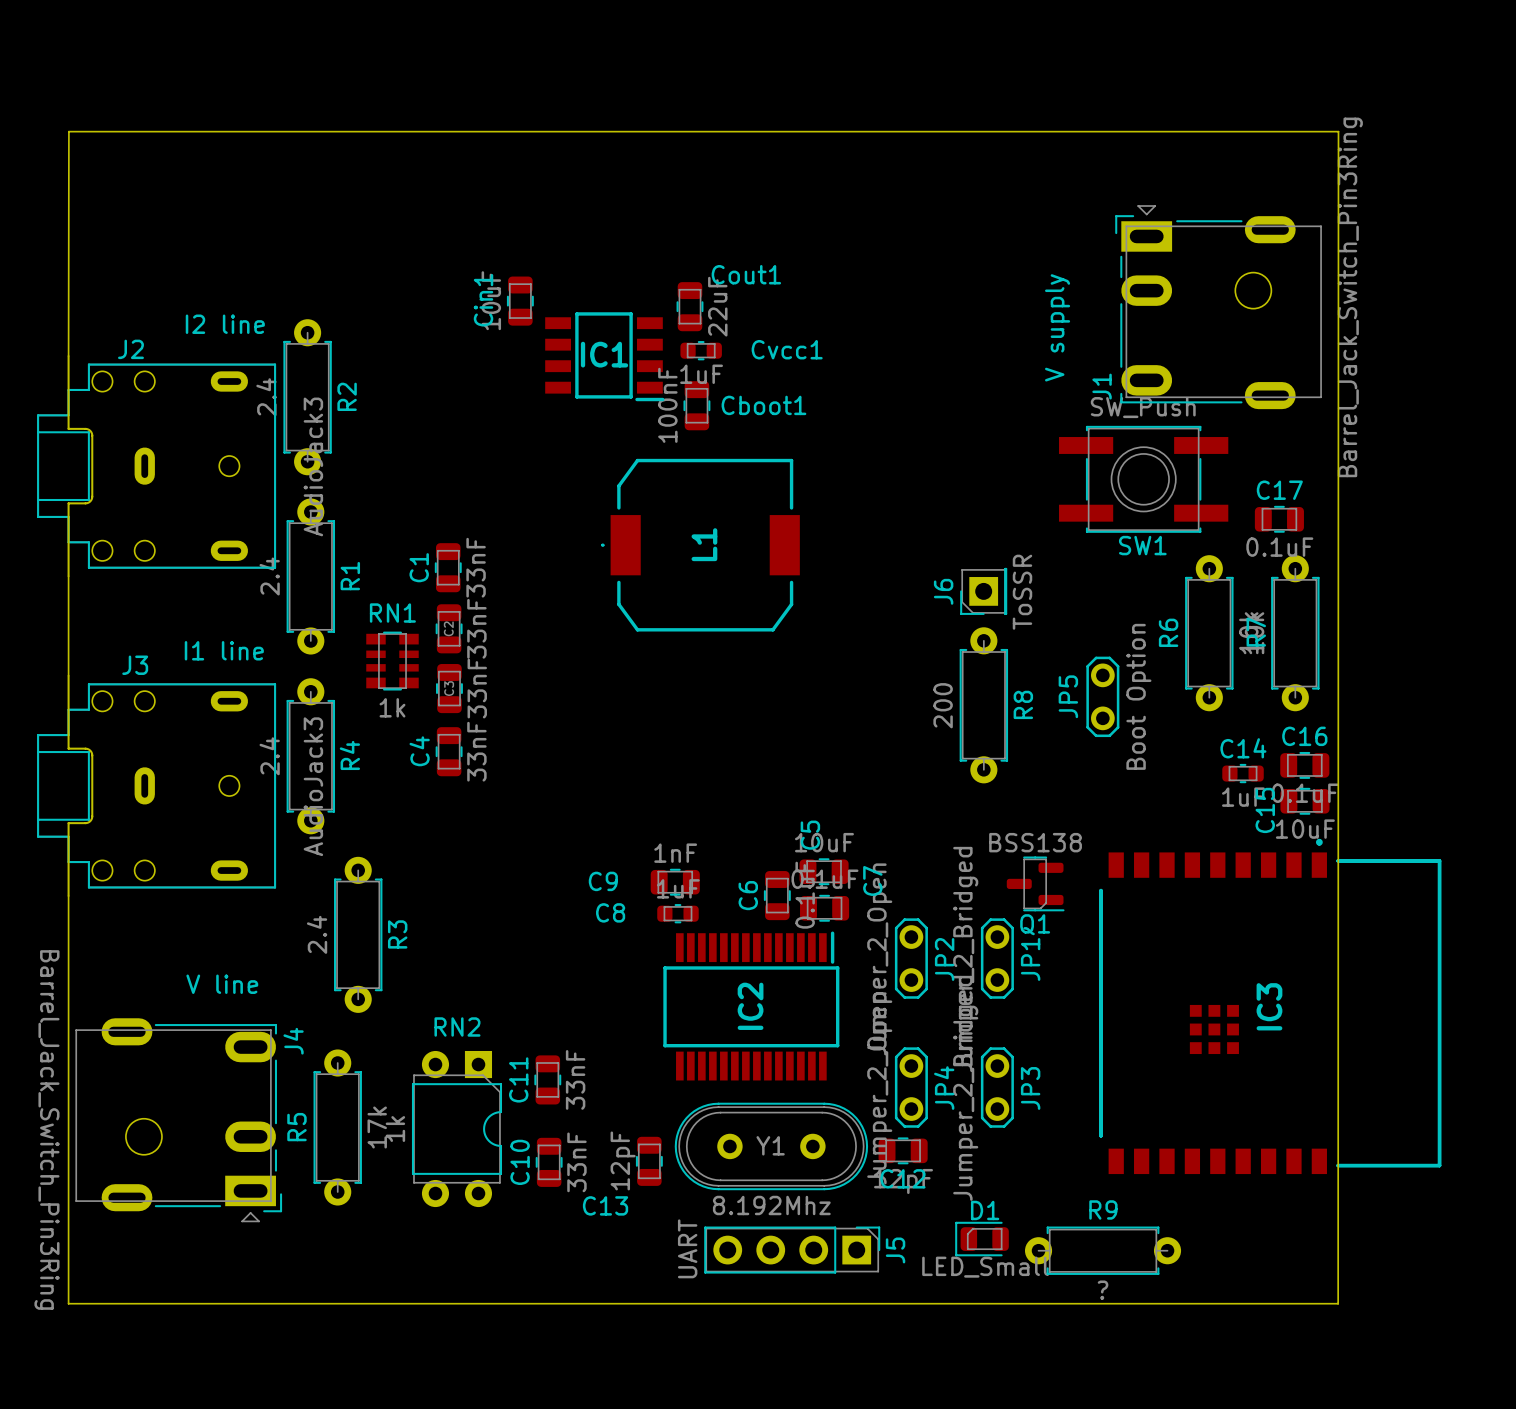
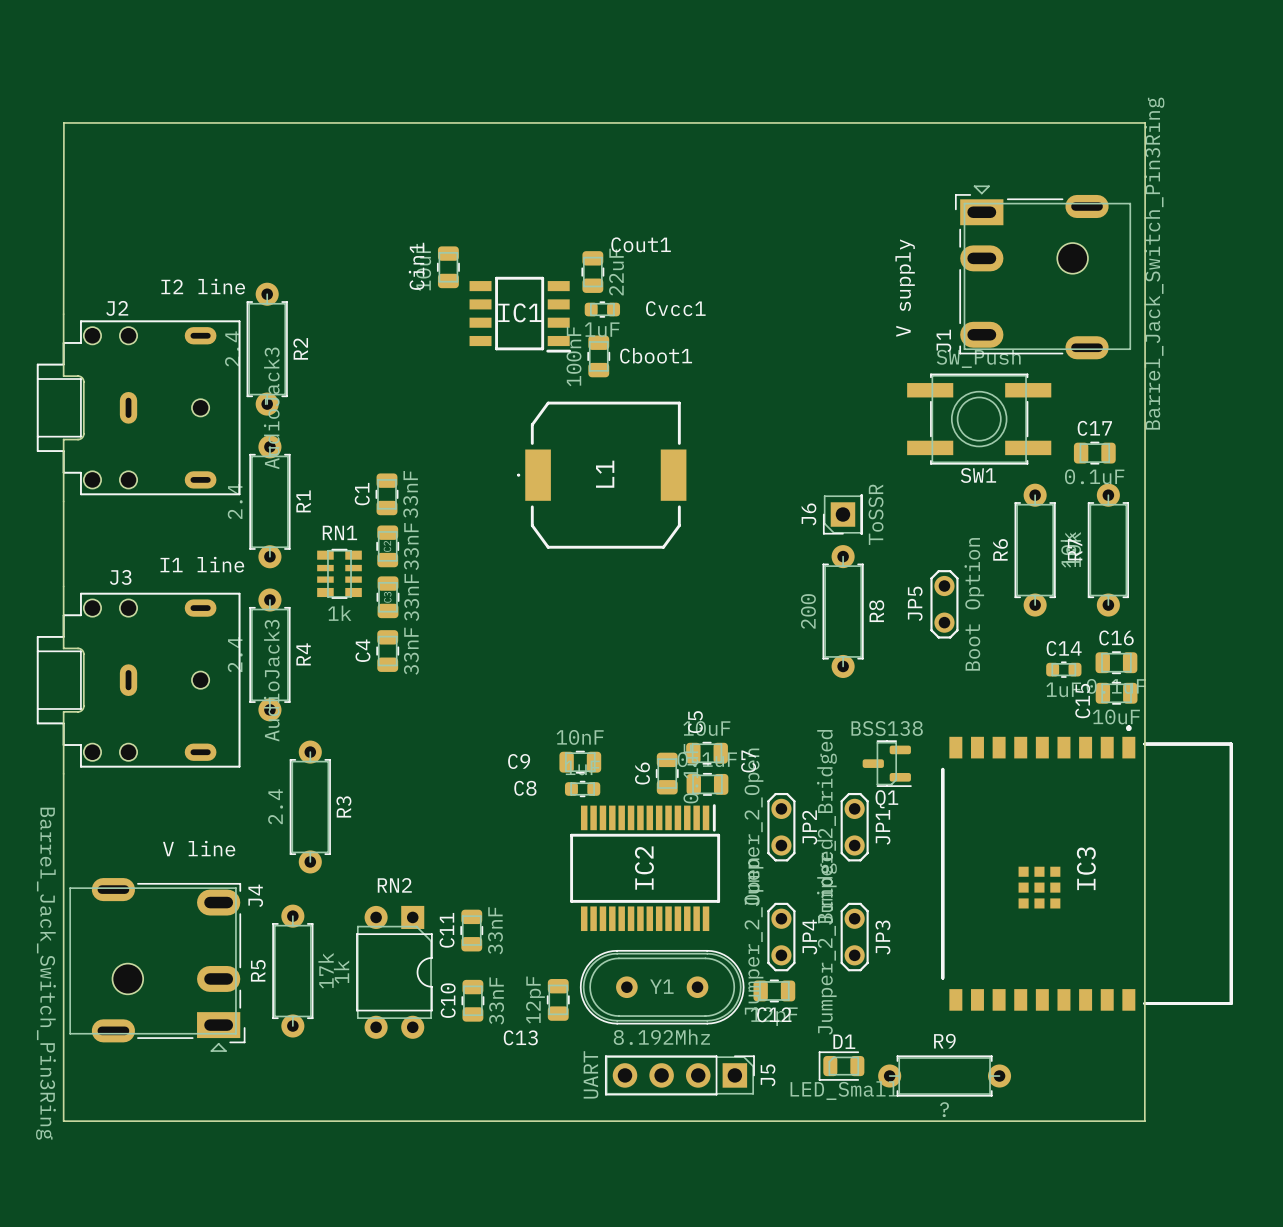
C9 value: 1nF (675, 853) -> 10nF (580, 737)

